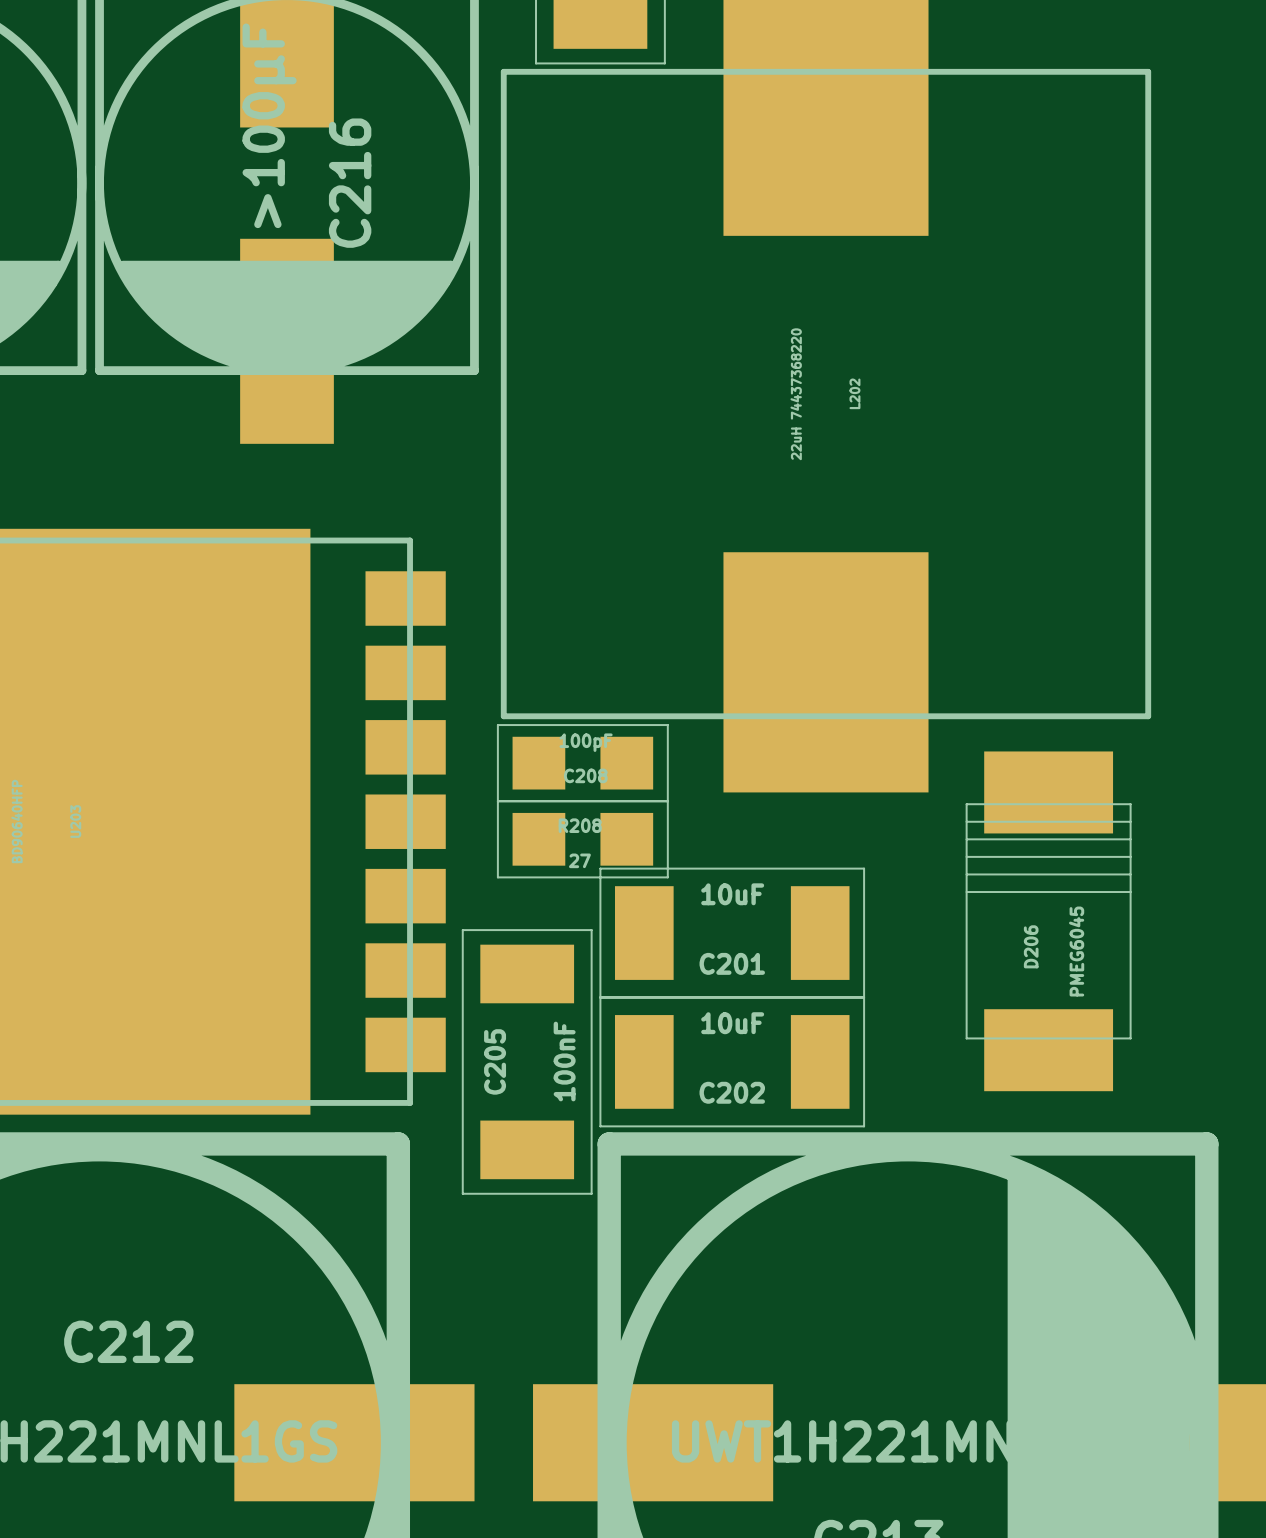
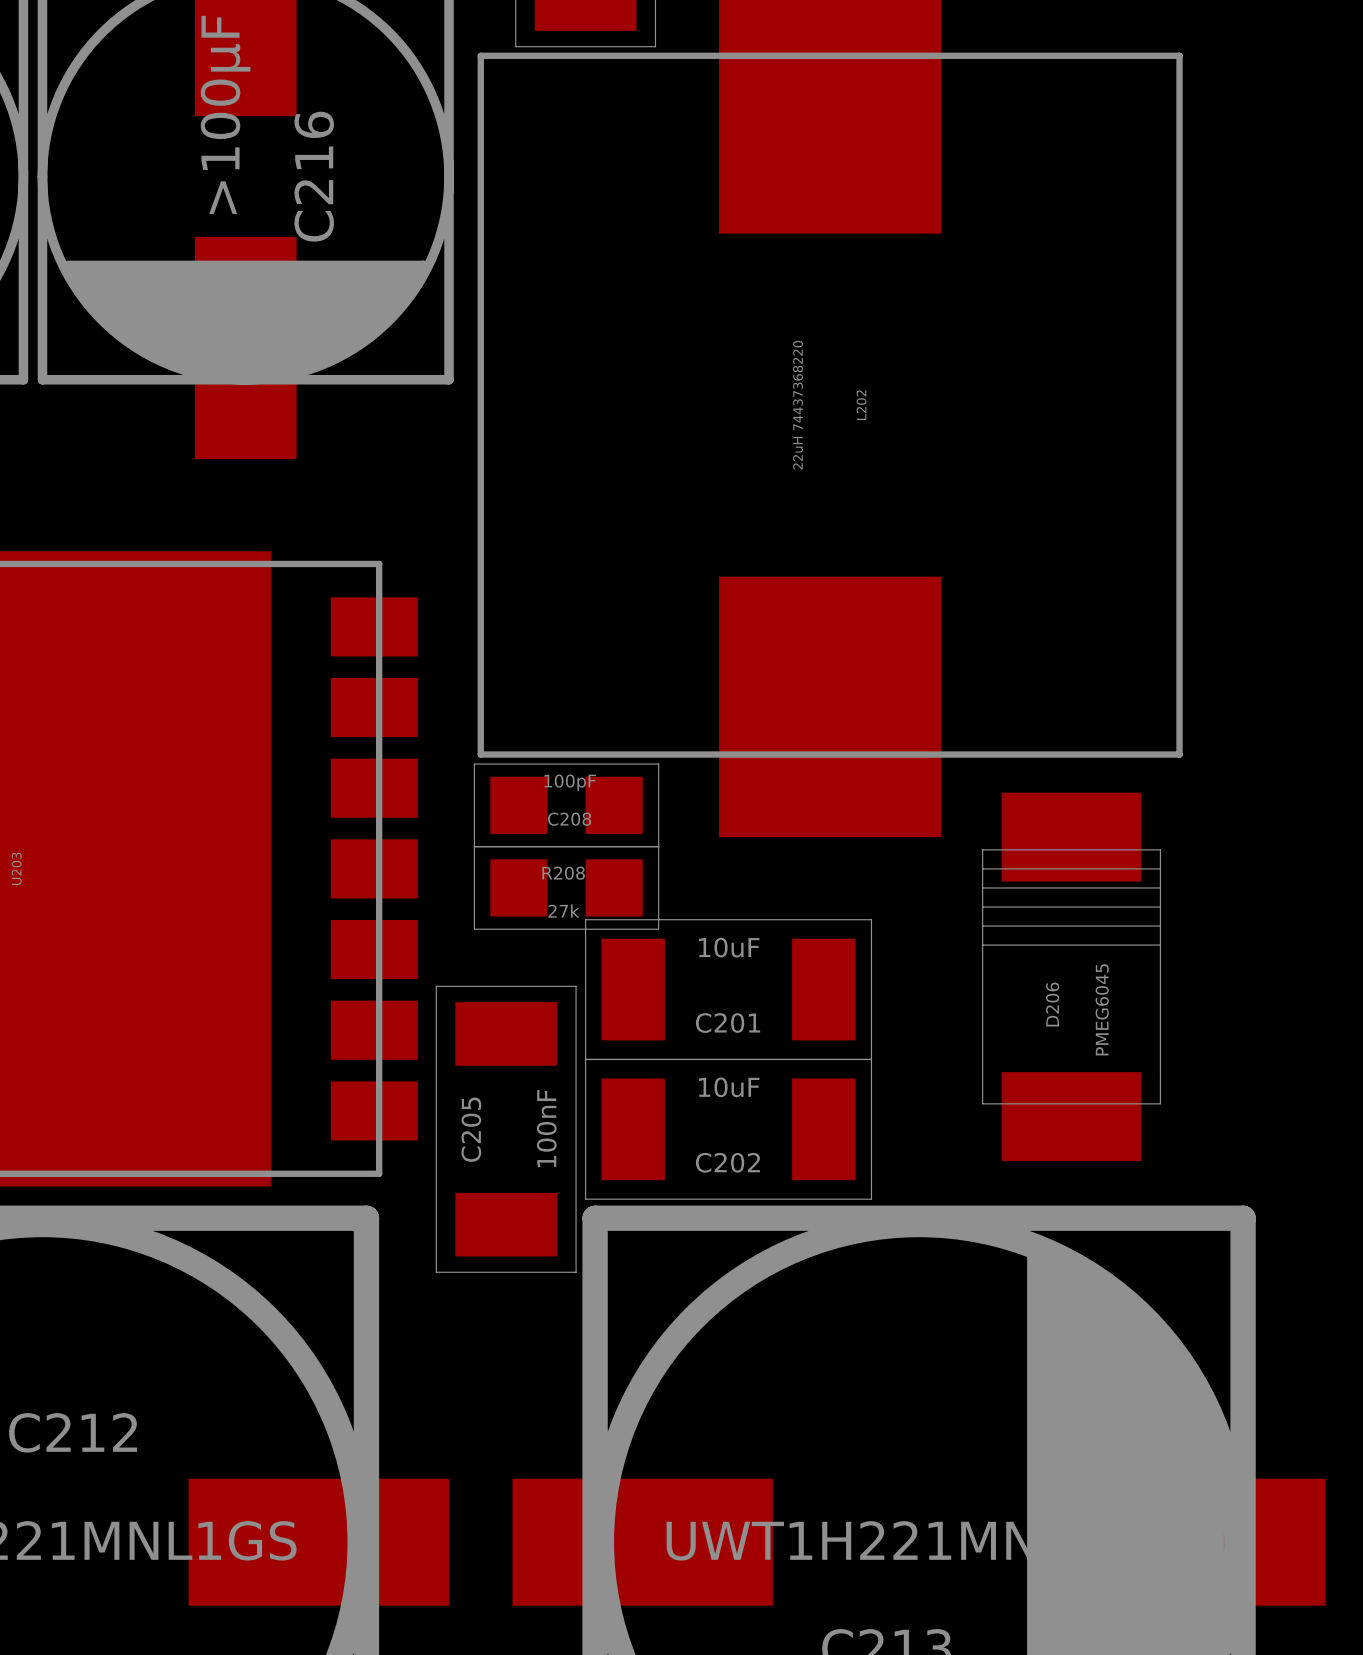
R208 value: 27 (579, 860) -> 27k (563, 911)

